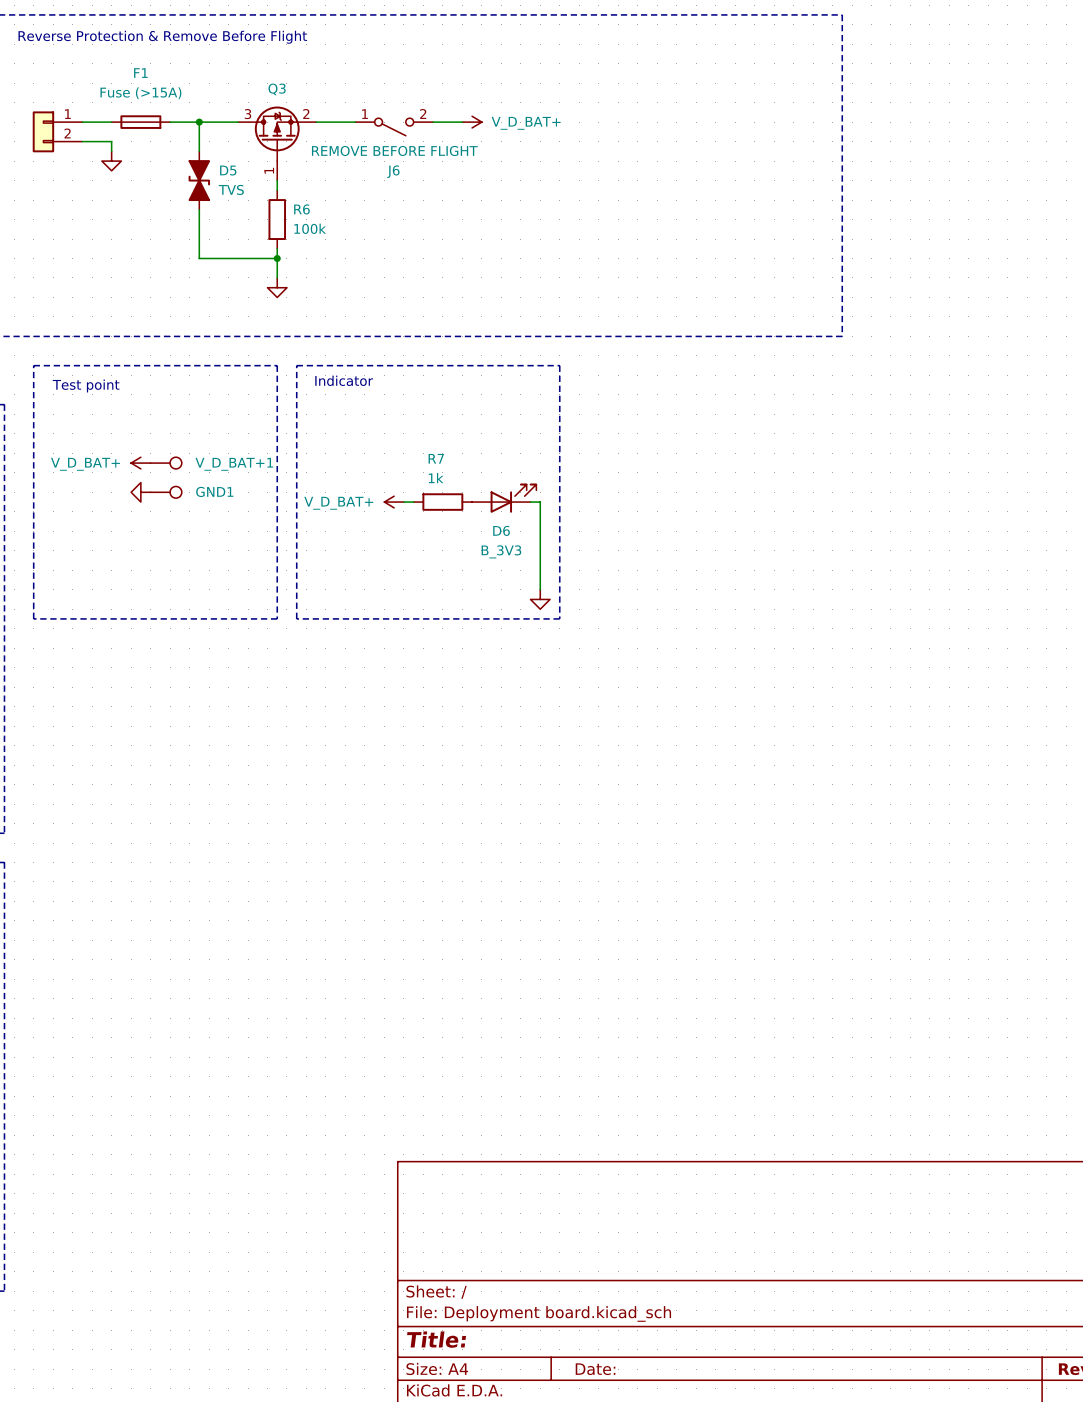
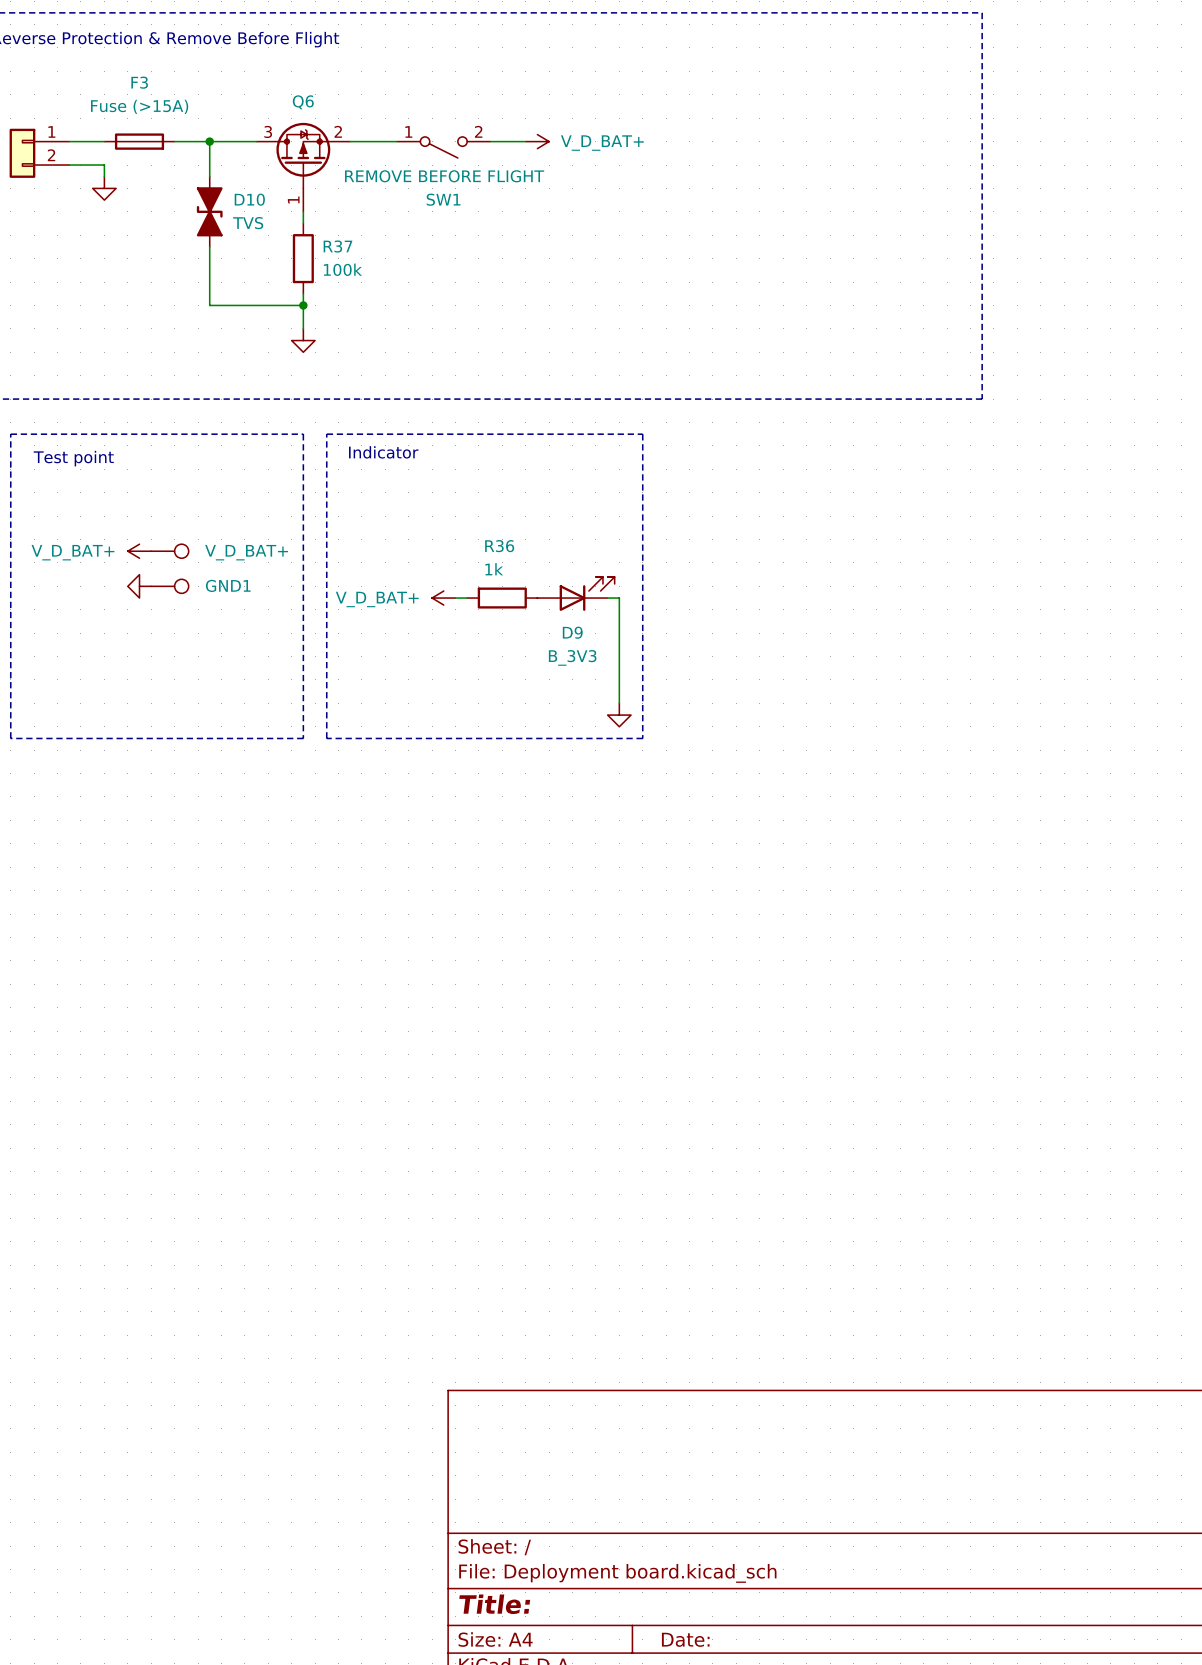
F1 name: F1 (140, 73) -> F3 (139, 82)
Q3 name: Q3 (277, 89) -> Q6 (303, 102)
D5 name: D5 (228, 170) -> D10 (249, 199)
J6 name: J6 (393, 171) -> SW1 (443, 199)
R6 name: R6 (301, 209) -> R37 (337, 246)
R7 name: R7 (436, 458) -> R36 (499, 546)
V_D_BAT+1 name: V_D_BAT+1 (234, 464) -> V_D_BAT+ (246, 552)
D6 name: D6 (501, 530) -> D9 (572, 632)

